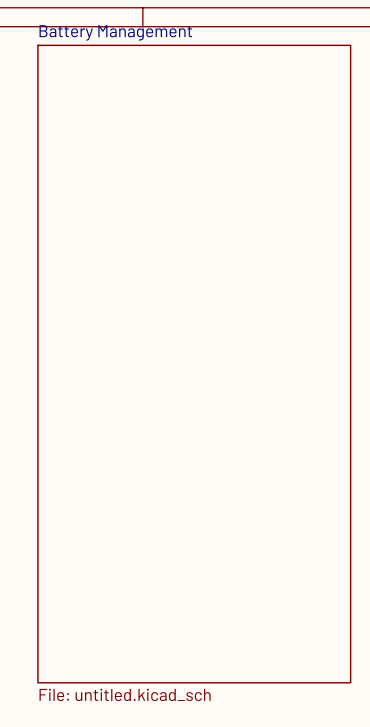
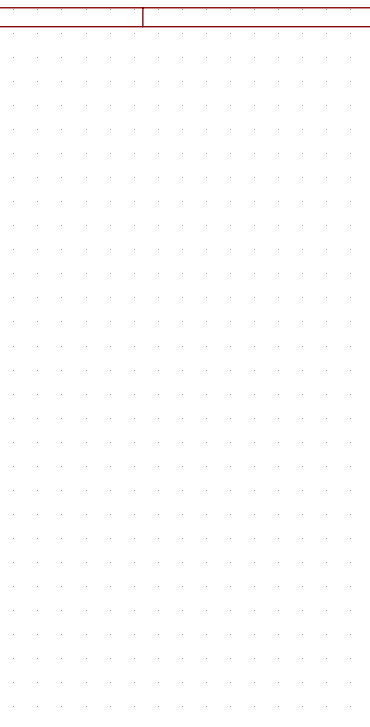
sheet Battery Management: File: untitled.kicad_sch (194, 364) -> none

